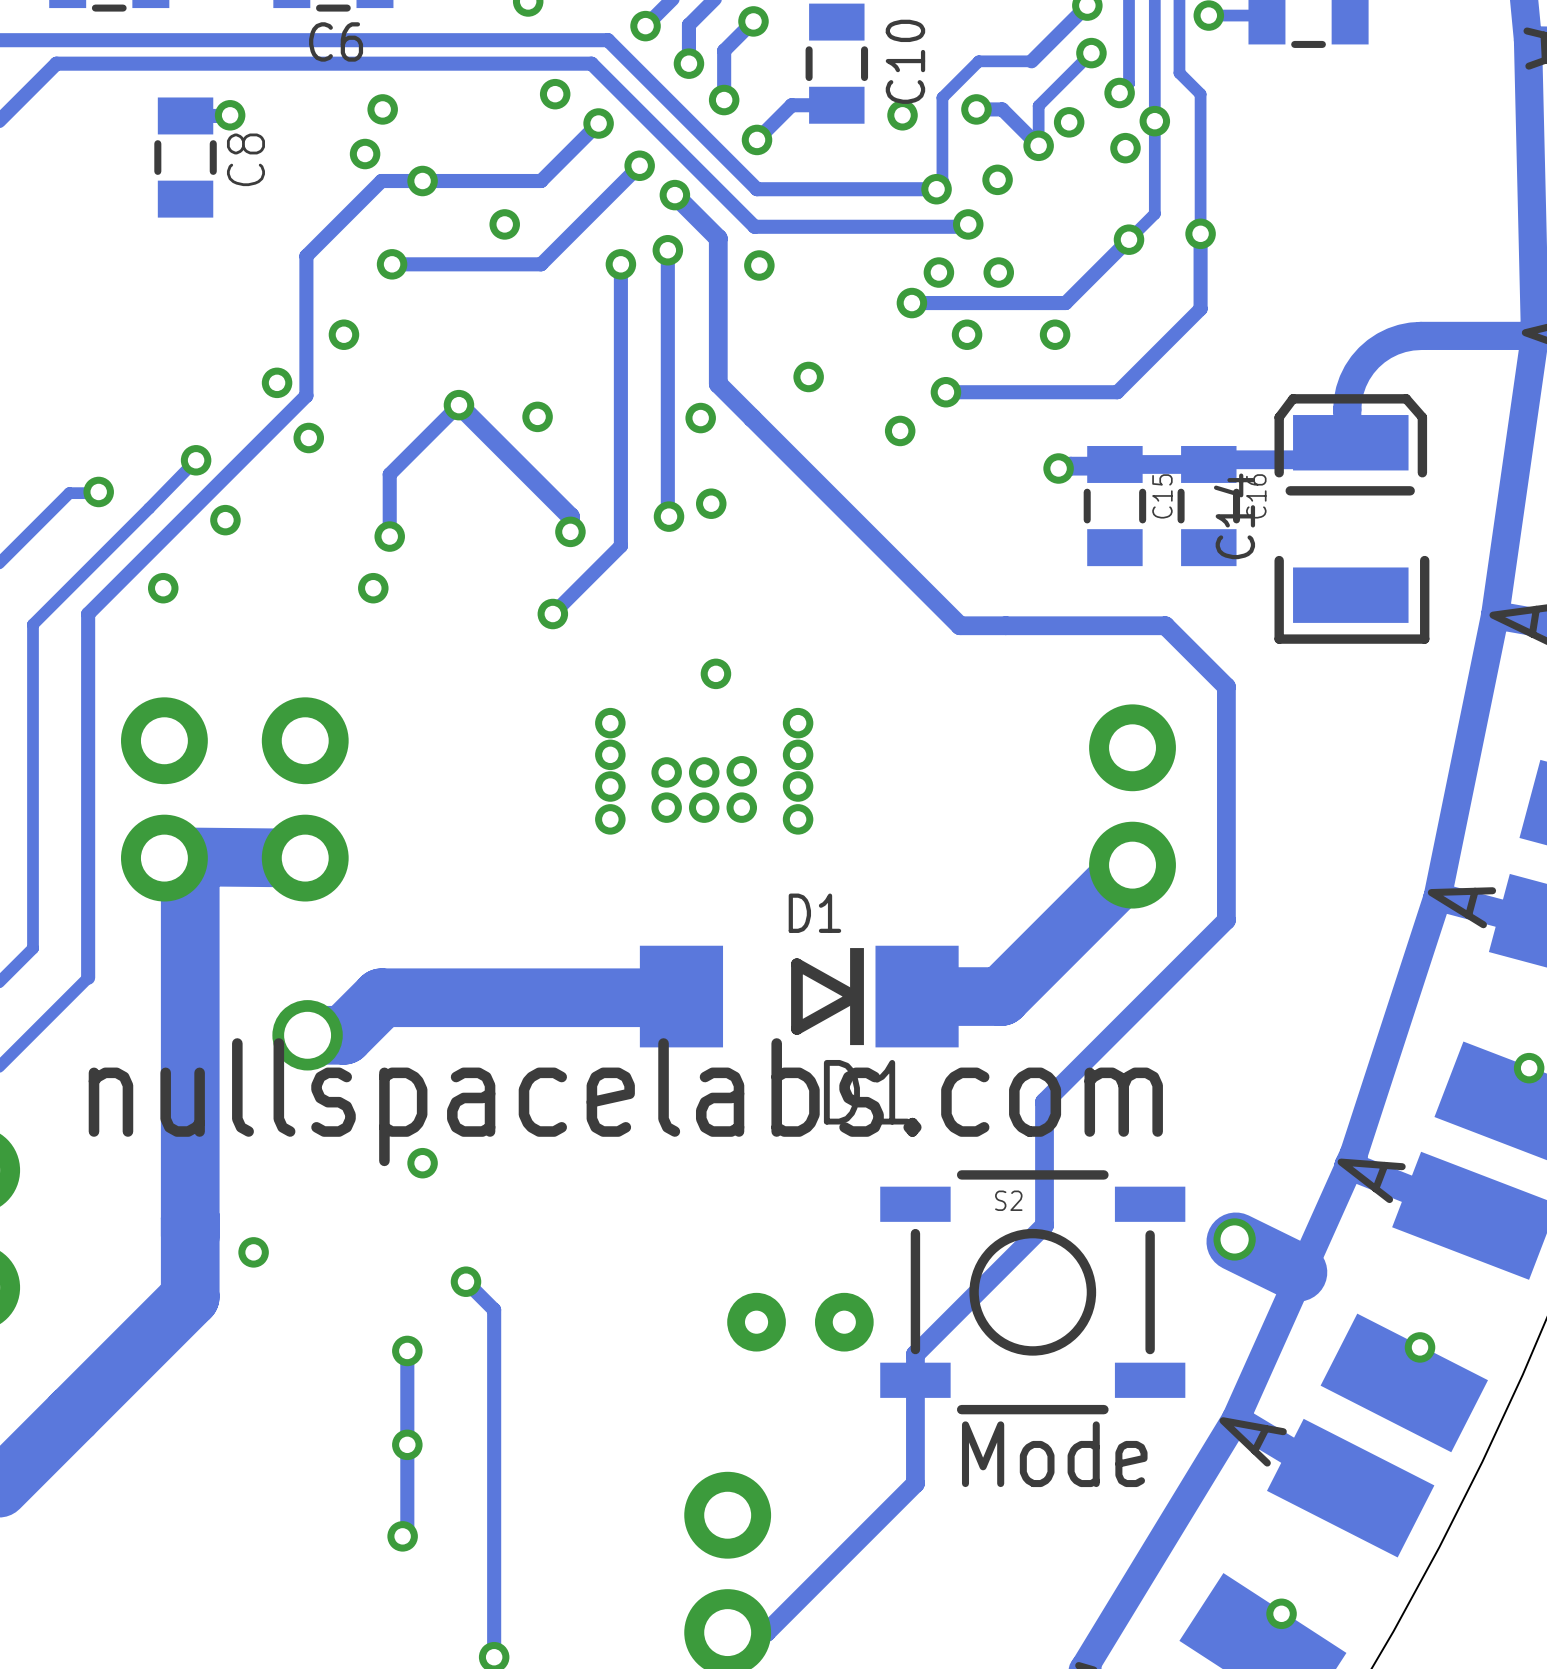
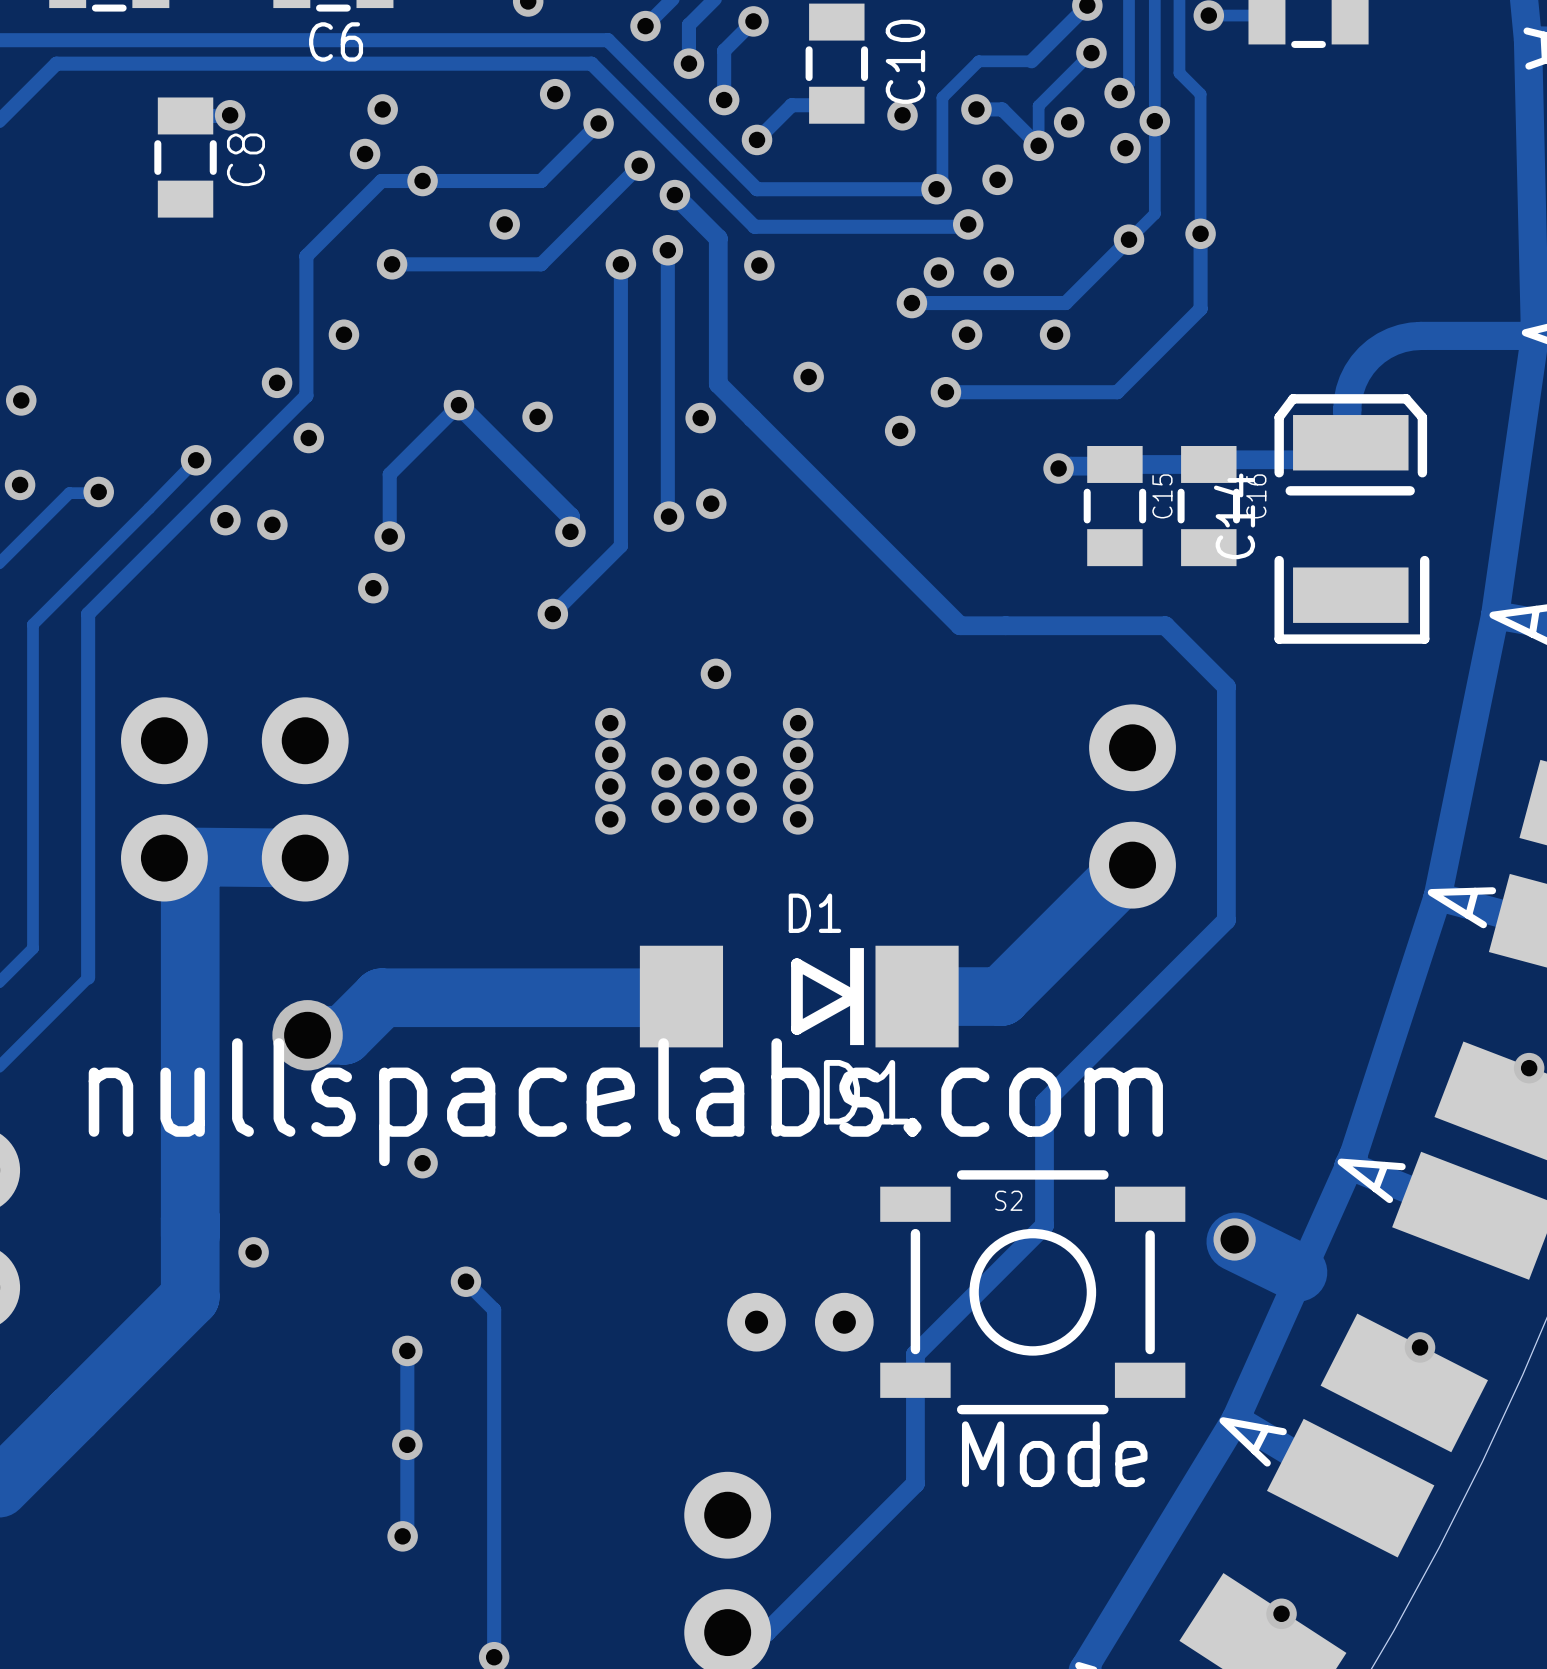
via: none -> (21, 400)
via: none -> (20, 484)
via: none -> (272, 524)
via: (163, 588) -> none

